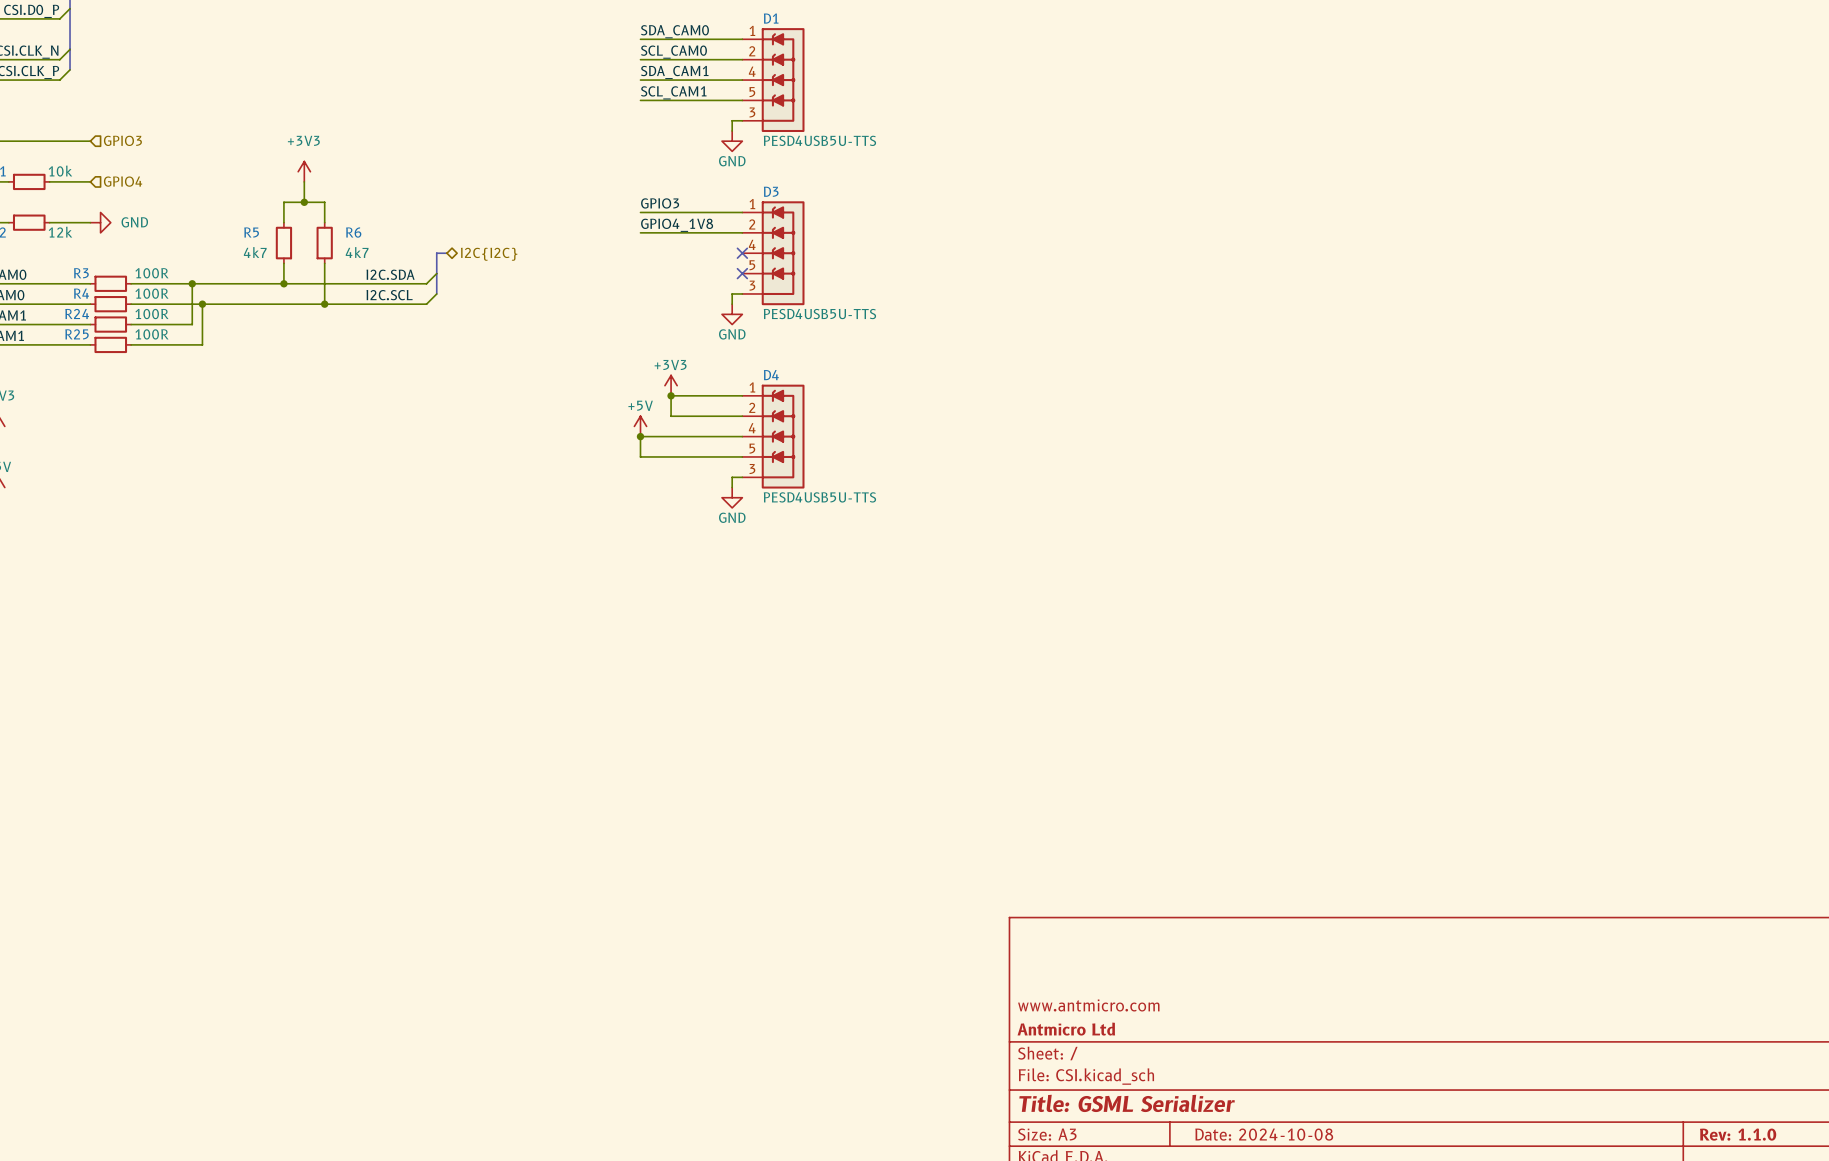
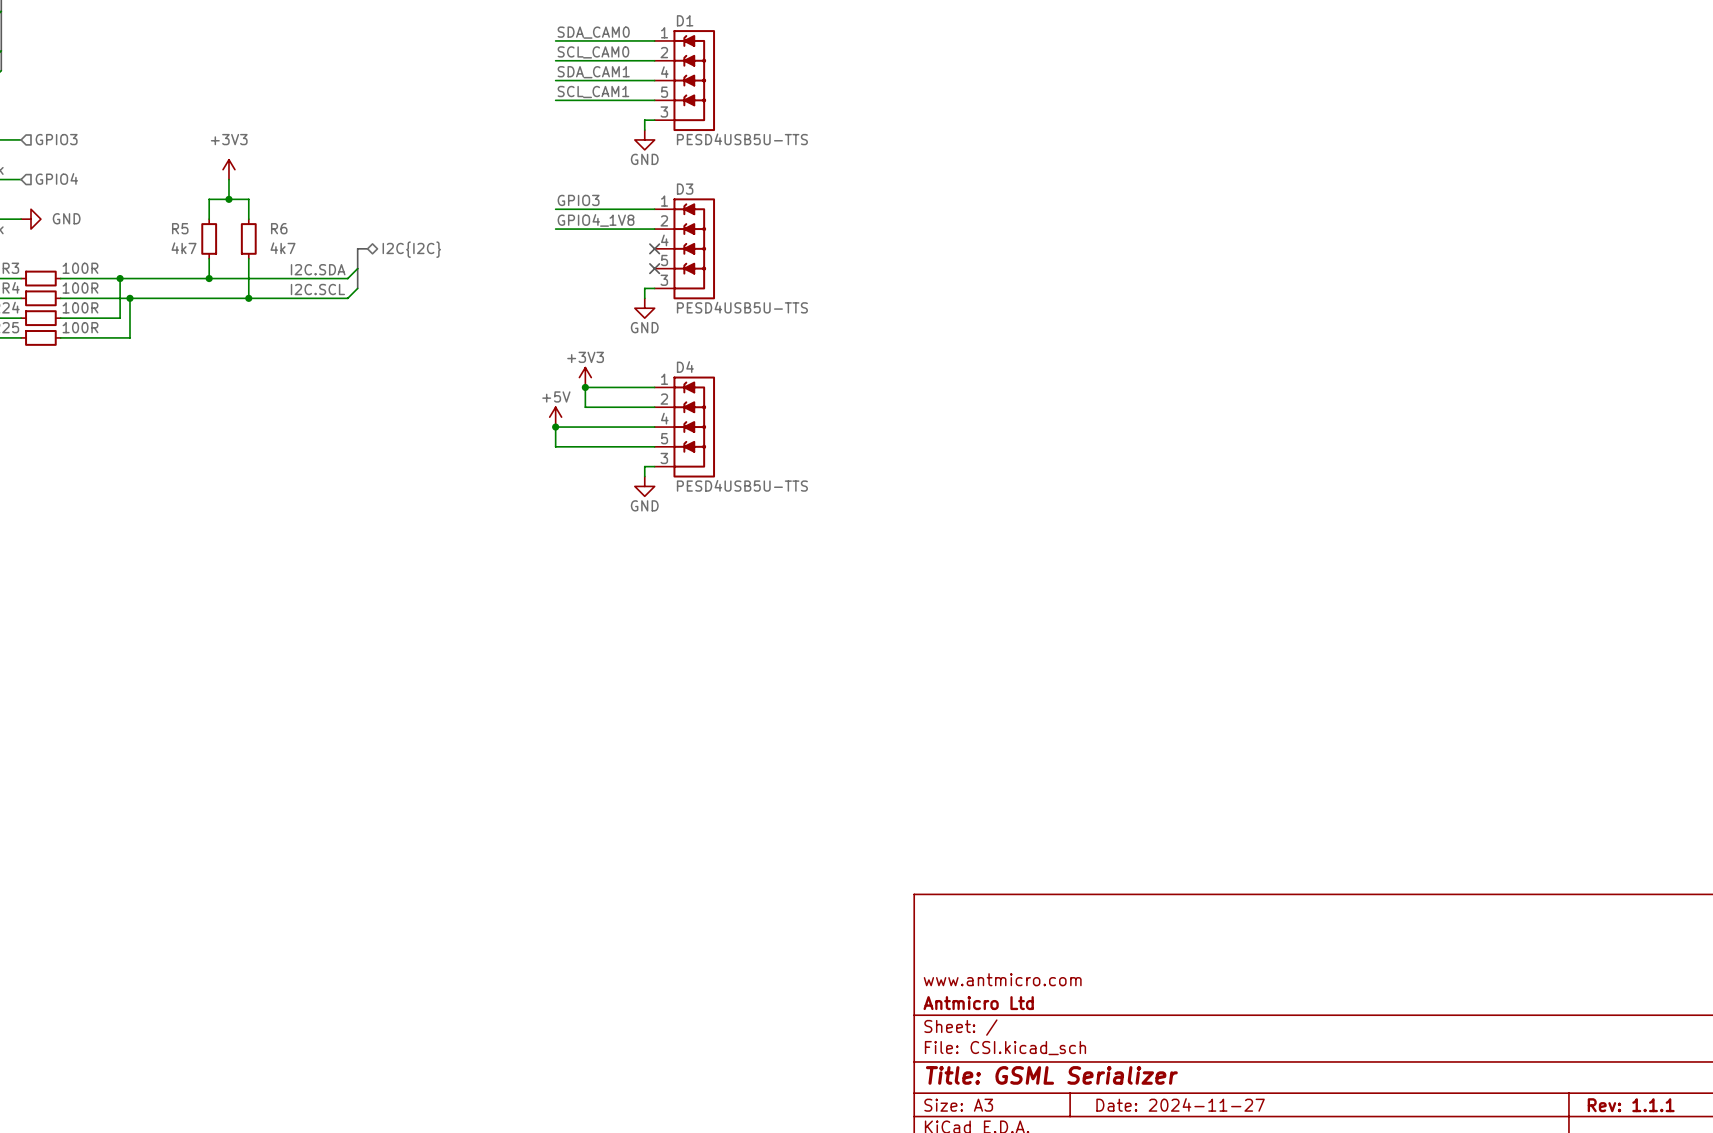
title block: Date: 2024-10-08 (1264, 1134) -> Date: 2024-11-27 (1180, 1104)
title block: Rev: 1.1.0 (1738, 1134) -> Rev: 1.1.1 (1631, 1105)

